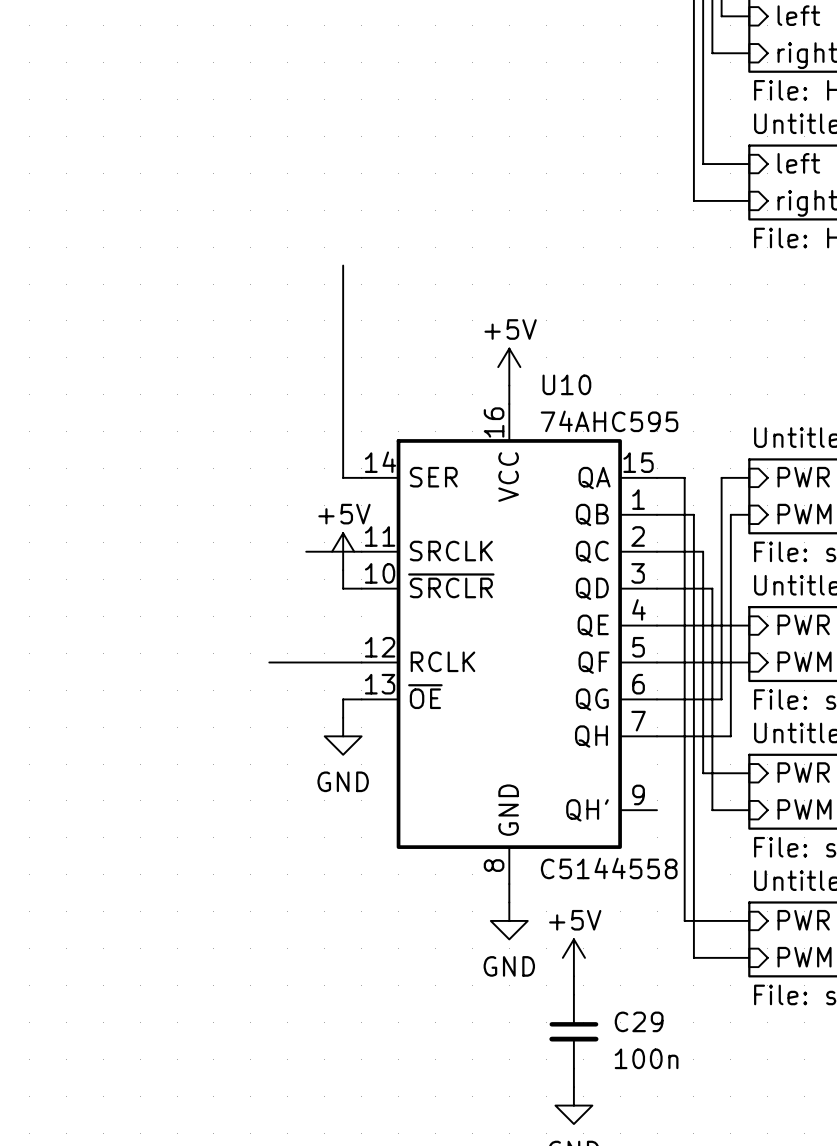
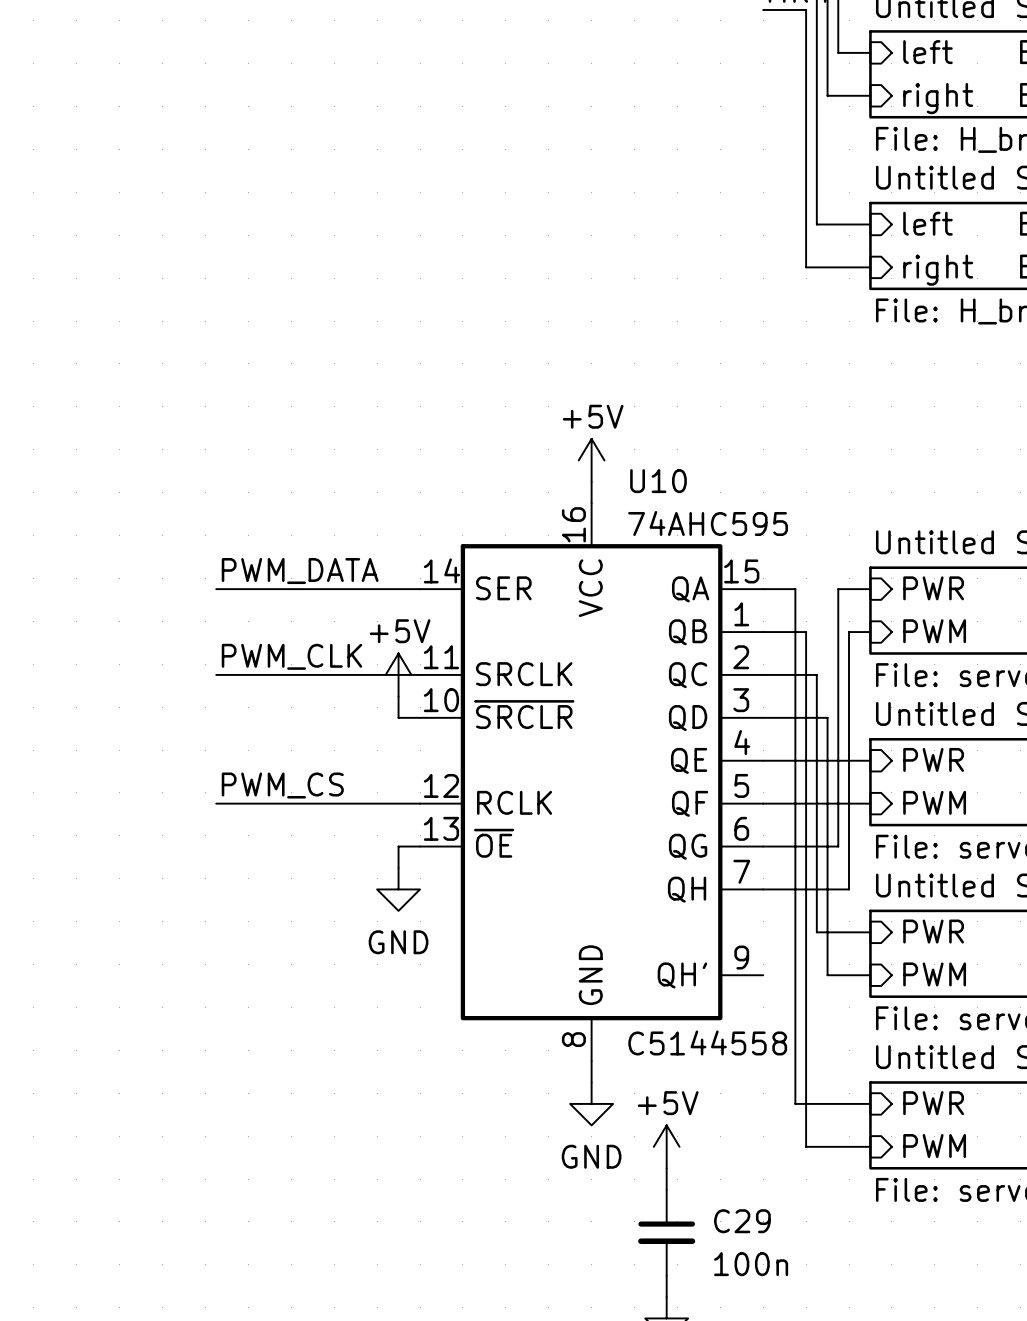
wire: (343, 265) (343, 477) -> (216, 589) (398, 589)
label: none -> PWM_DATA (300, 571)
label: none -> PWM_CLK (291, 656)
wire: none -> (216, 674) (355, 674)
label: none -> PWM_CS (282, 785)
wire: none -> (216, 803) (312, 803)

